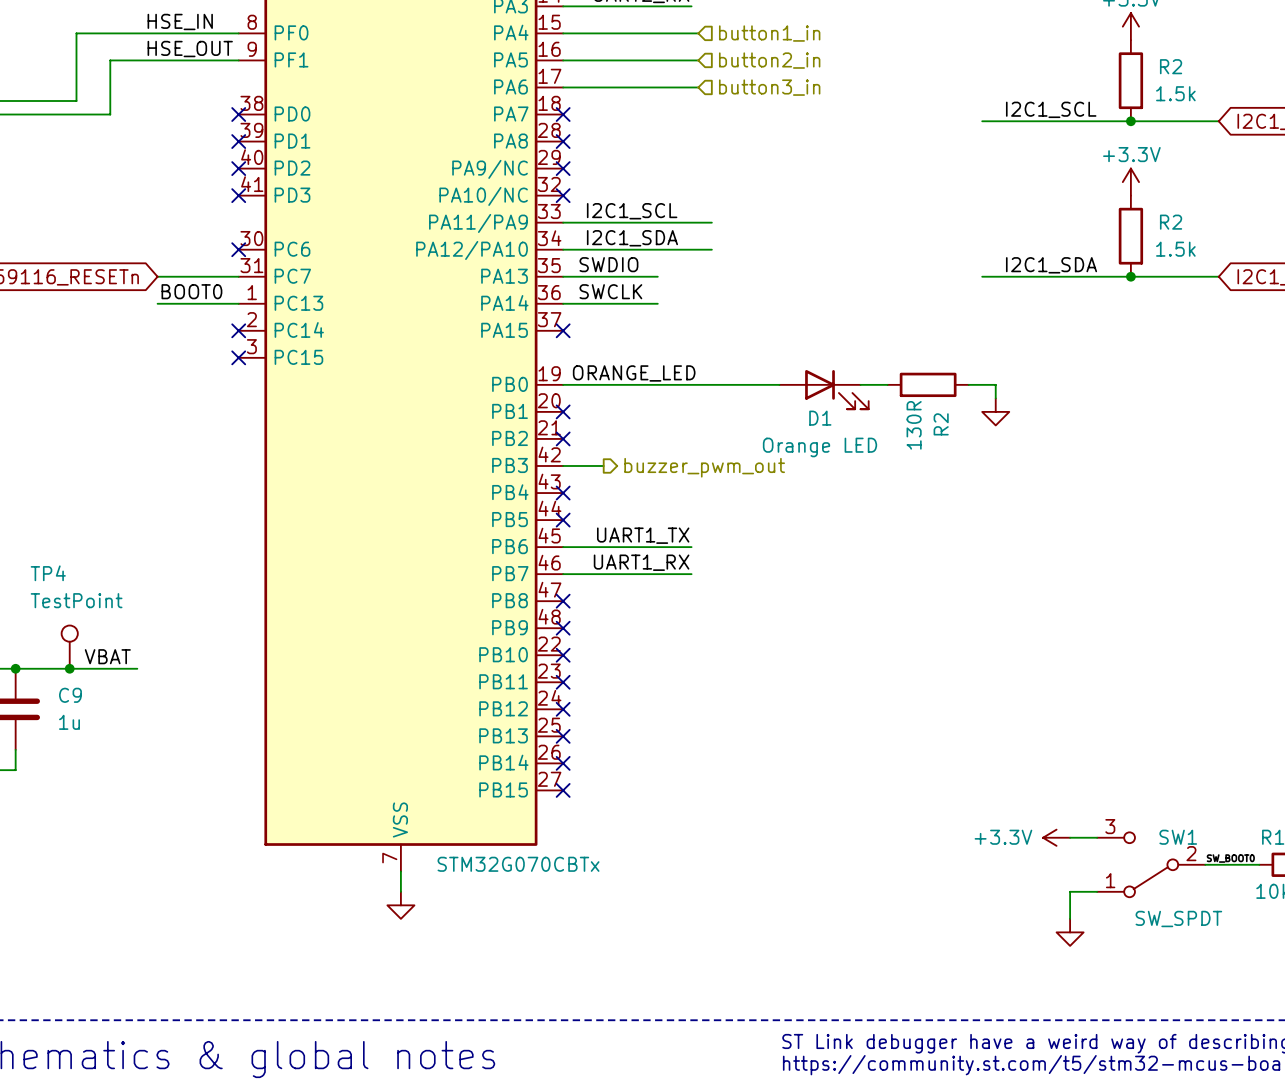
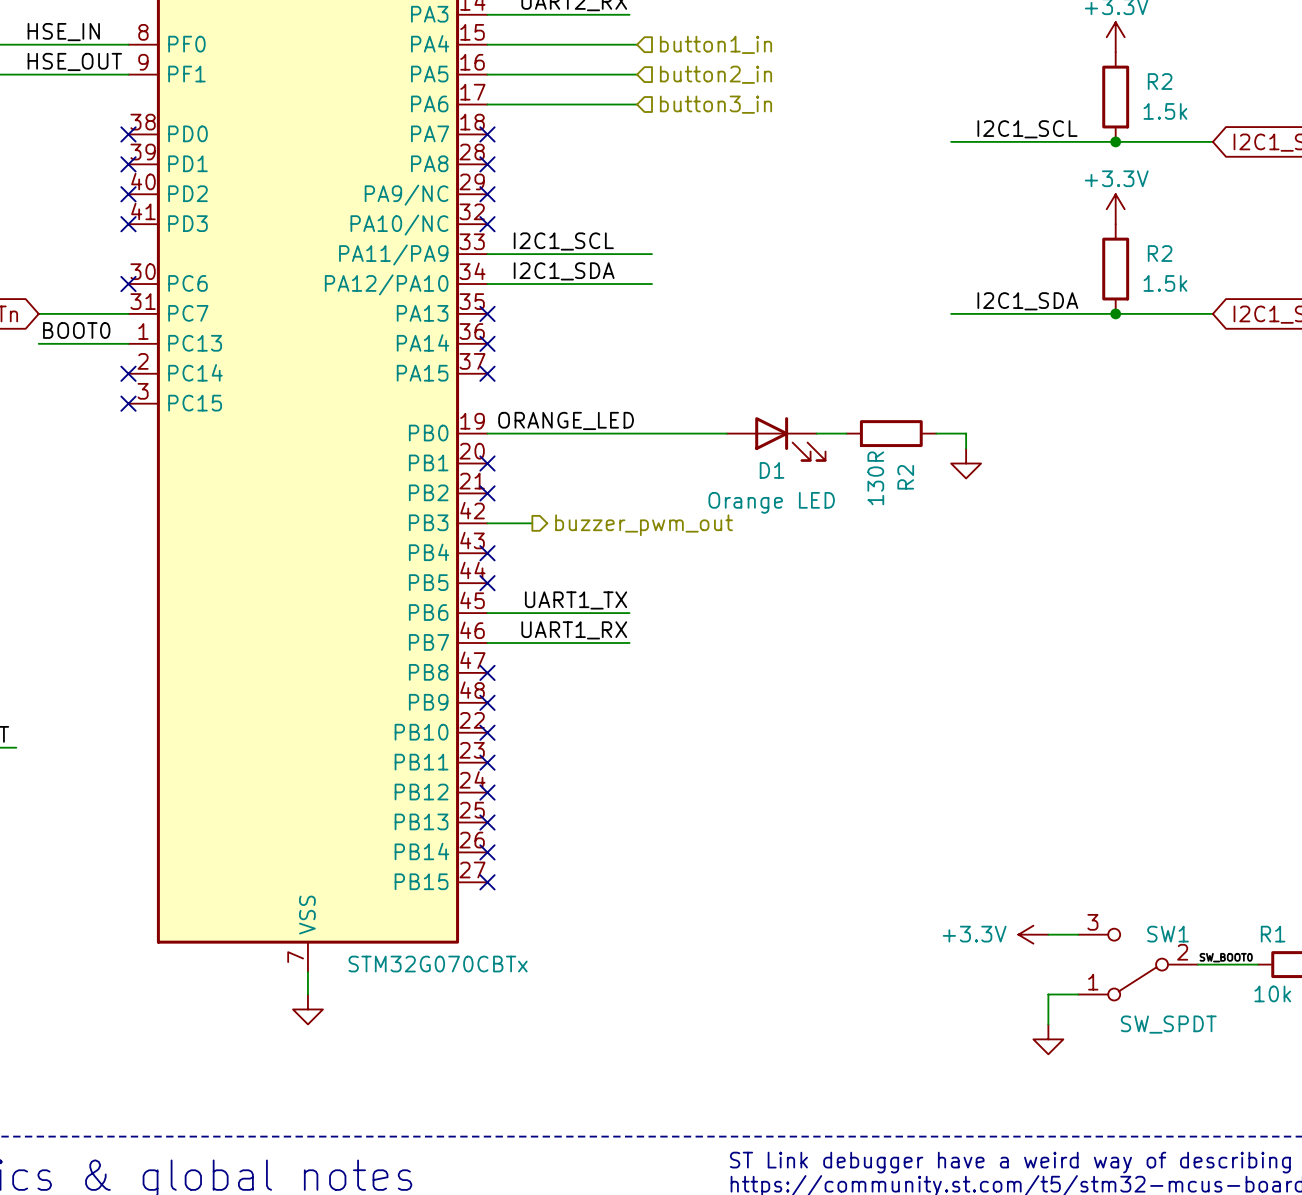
label: SWDIO (608, 264) -> none
wire: (563, 276) (657, 276) -> none
no-connect mark: none -> (487, 313)
label: SWCLK (610, 291) -> none
wire: (563, 303) (657, 303) -> none
no-connect mark: none -> (487, 343)

